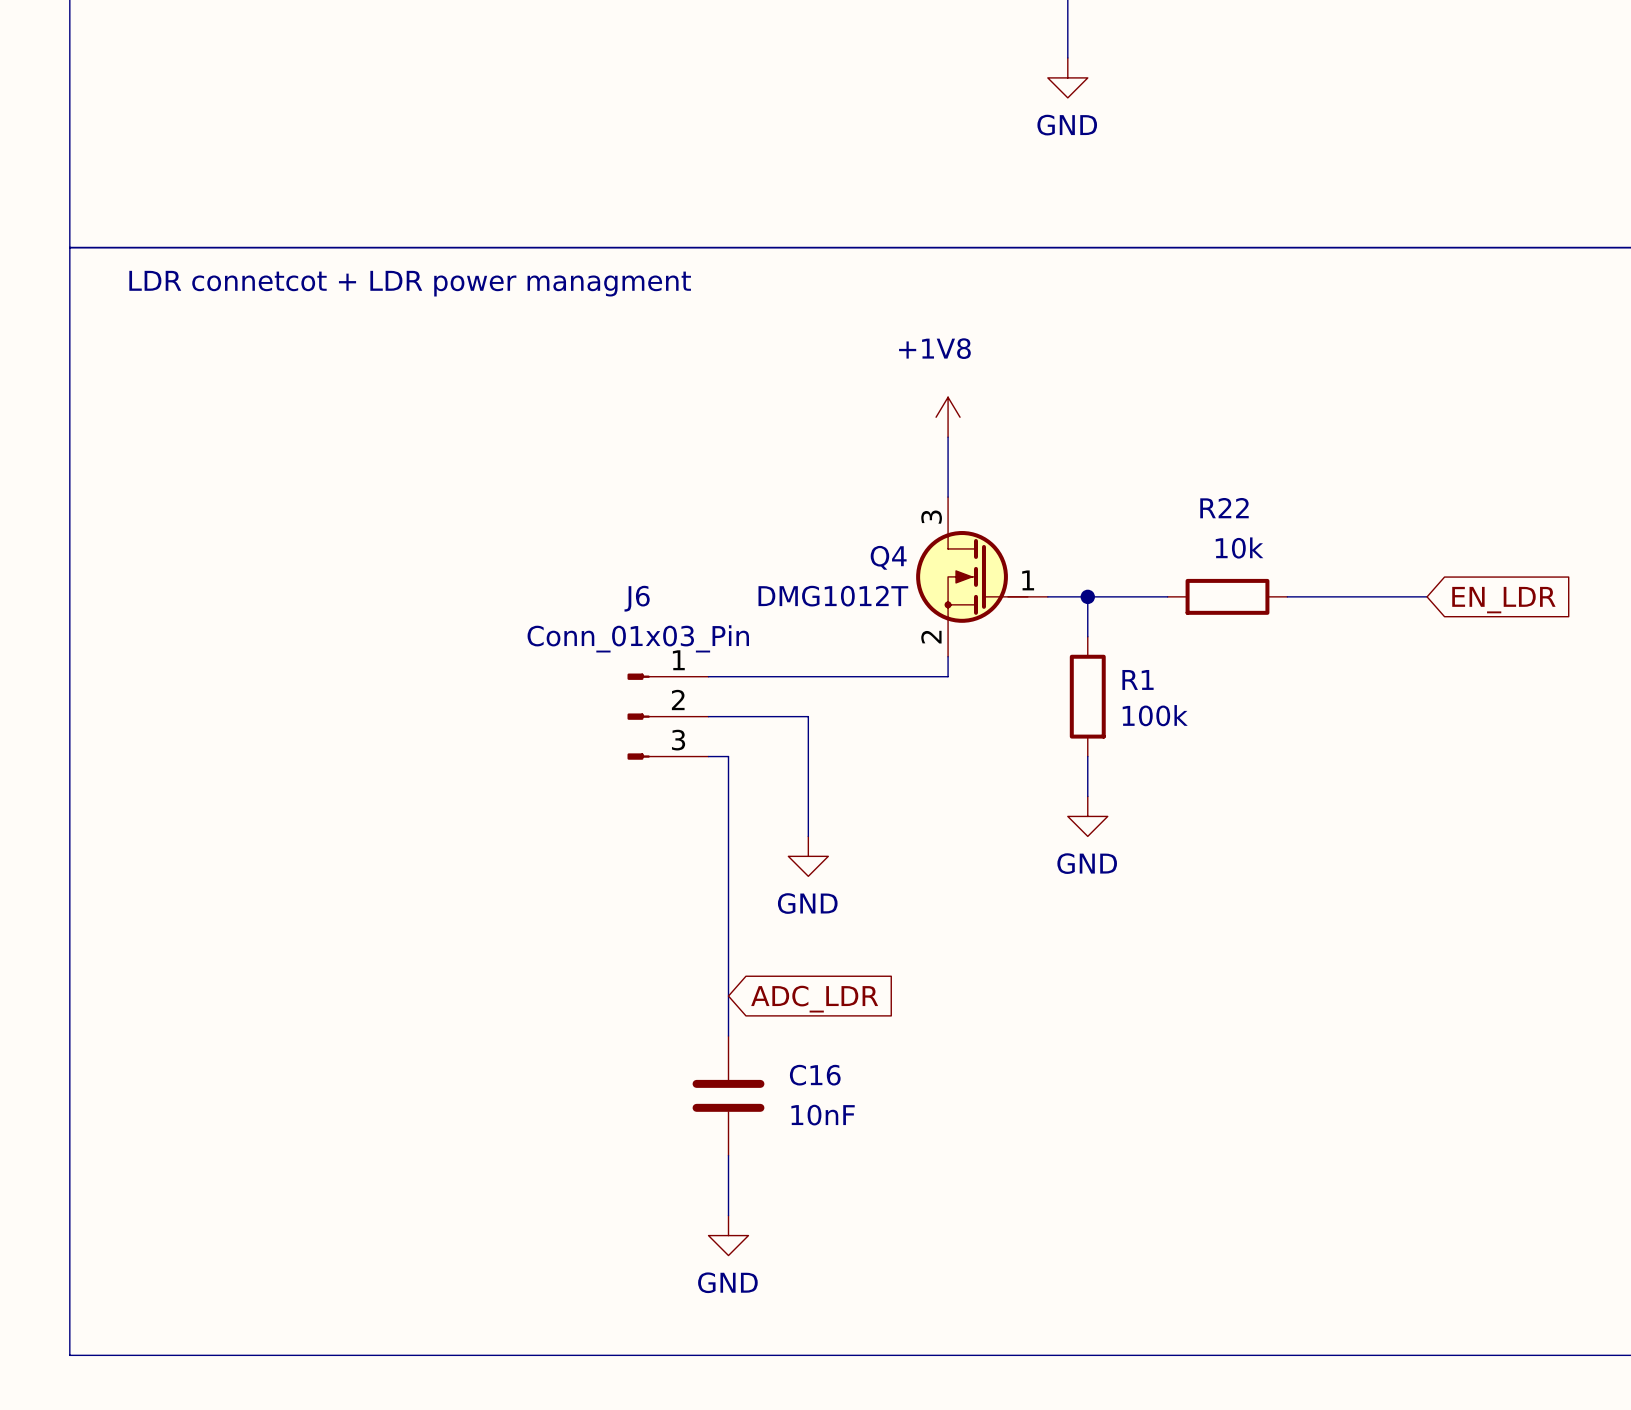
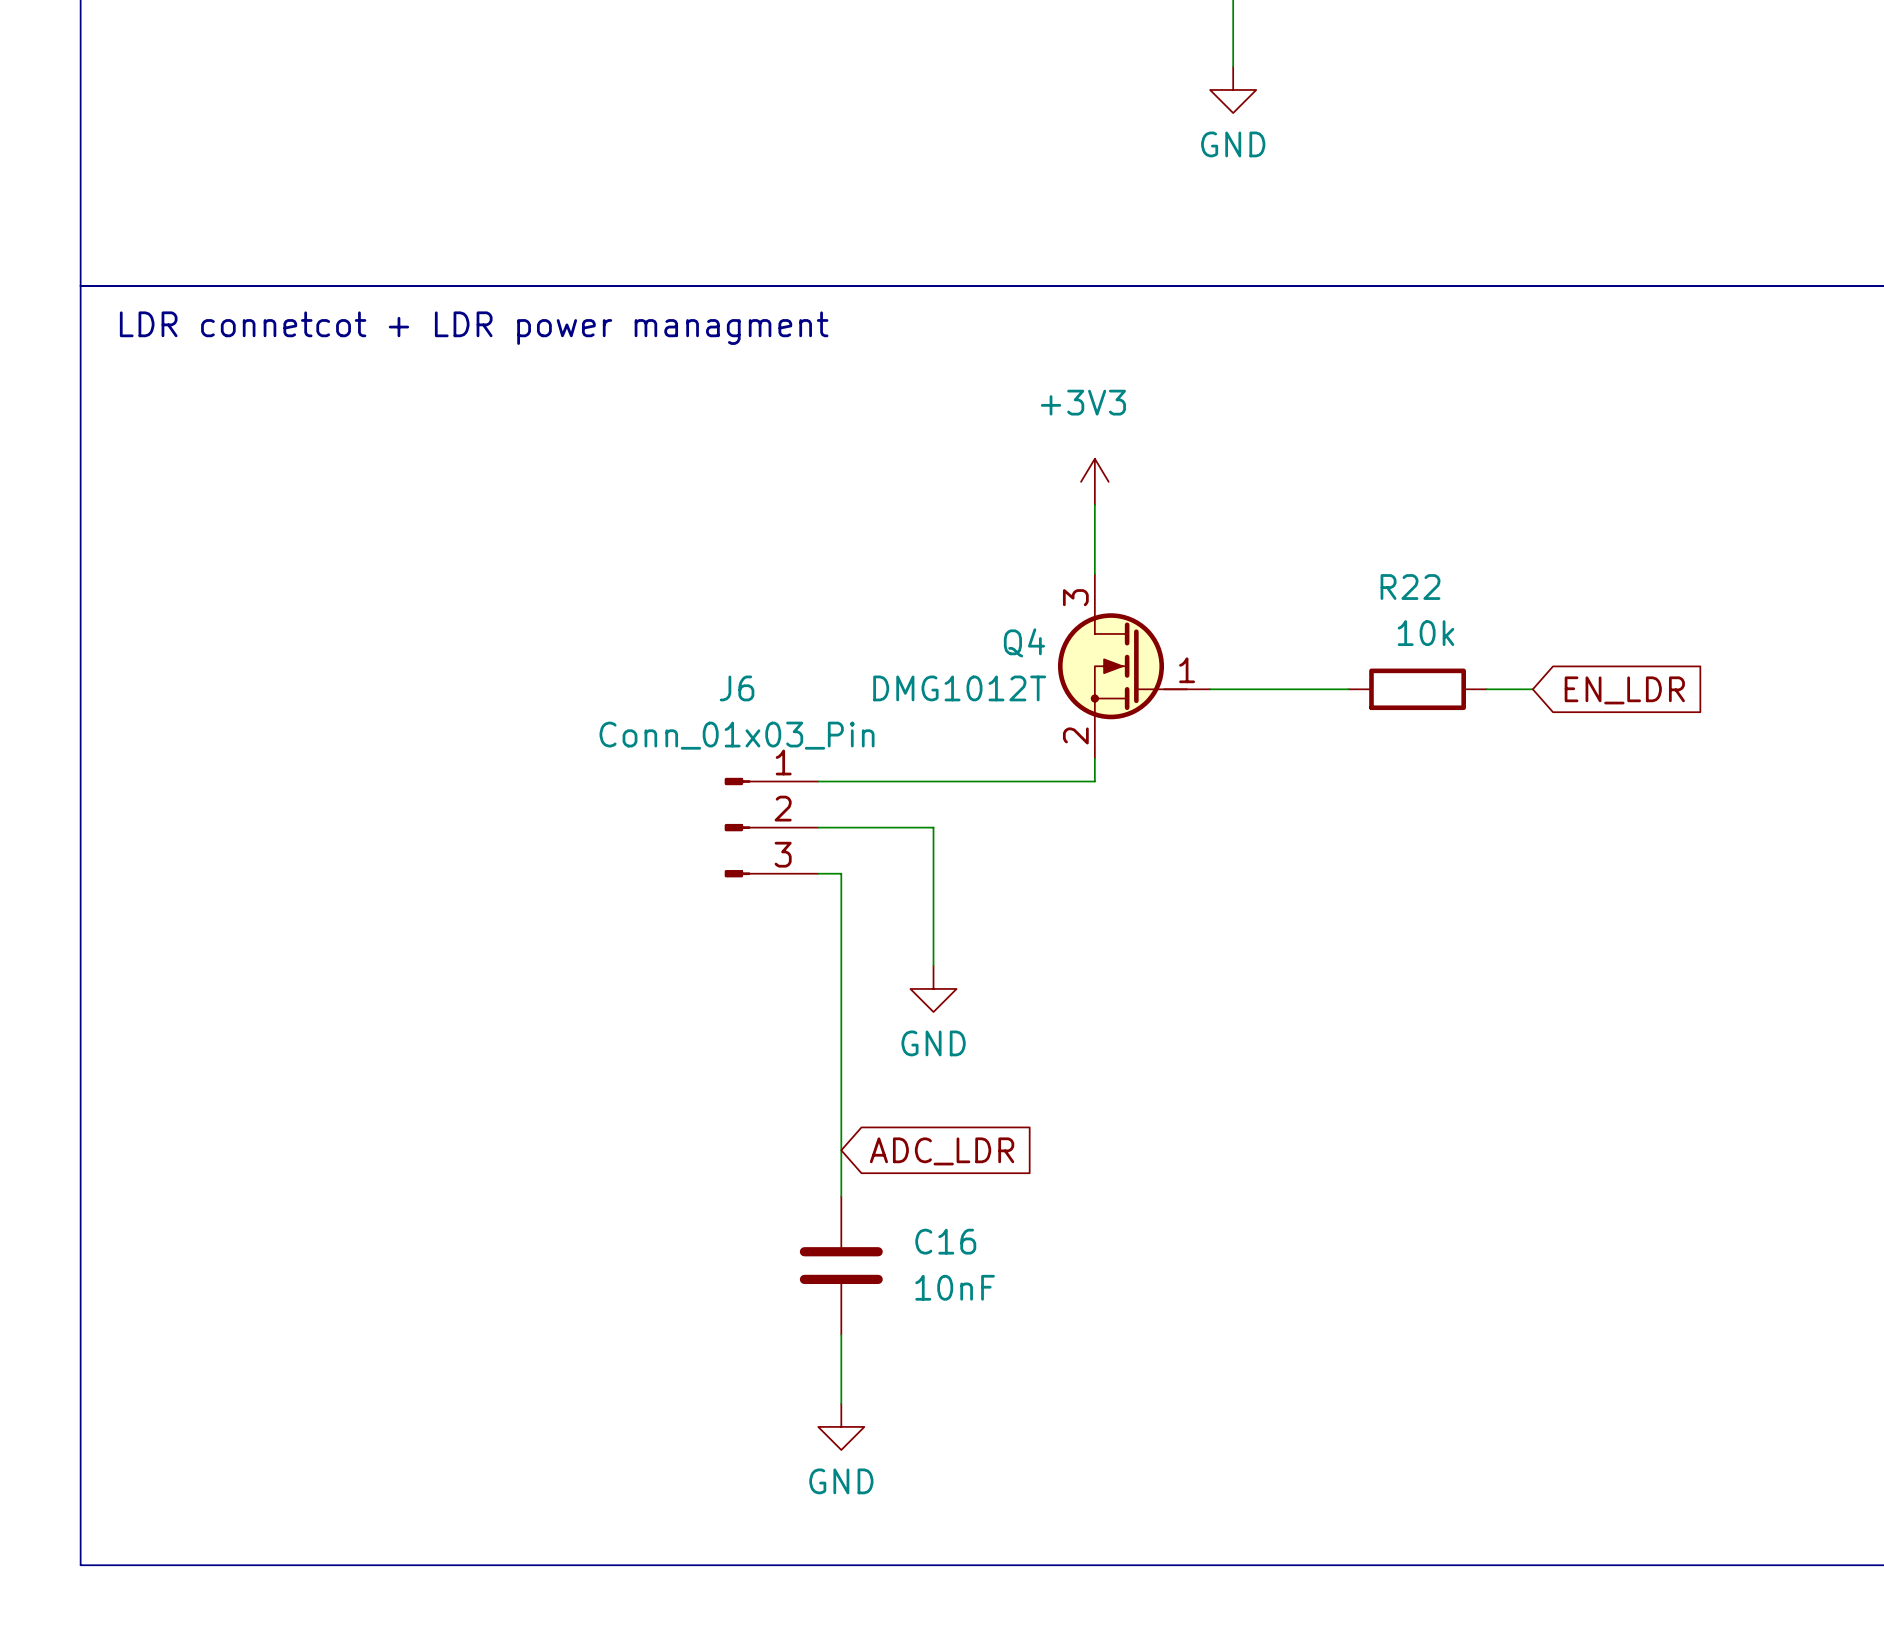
power symbol: +1V8 (948, 417) -> +3V3 (1094, 481)
wire: (1087, 596) (1087, 636) -> none
junction: (1087, 596) -> none
wire: (1327, 596) (1427, 596) -> none
global label position: EN_LDR (1503, 600) -> EN_LDR (1624, 690)
R1: 100k (1087, 696) -> none
wire: (1087, 756) (1087, 796) -> none
power symbol: GND (1087, 816) -> none

